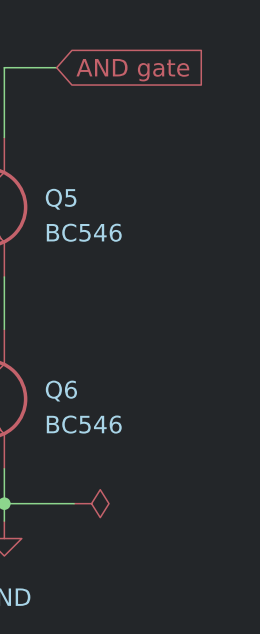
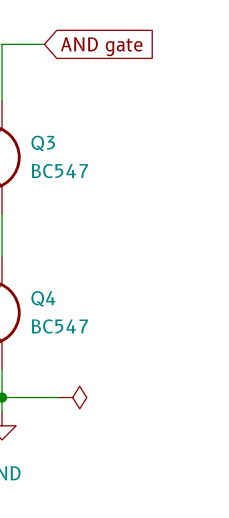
Q5 name: Q5 (61, 199) -> Q3 (43, 143)
Q5 value: BC546 (84, 232) -> BC547 (59, 171)
Q6 name: Q6 (61, 391) -> Q4 (43, 298)
Q6 value: BC546 (84, 424) -> BC547 (59, 326)

